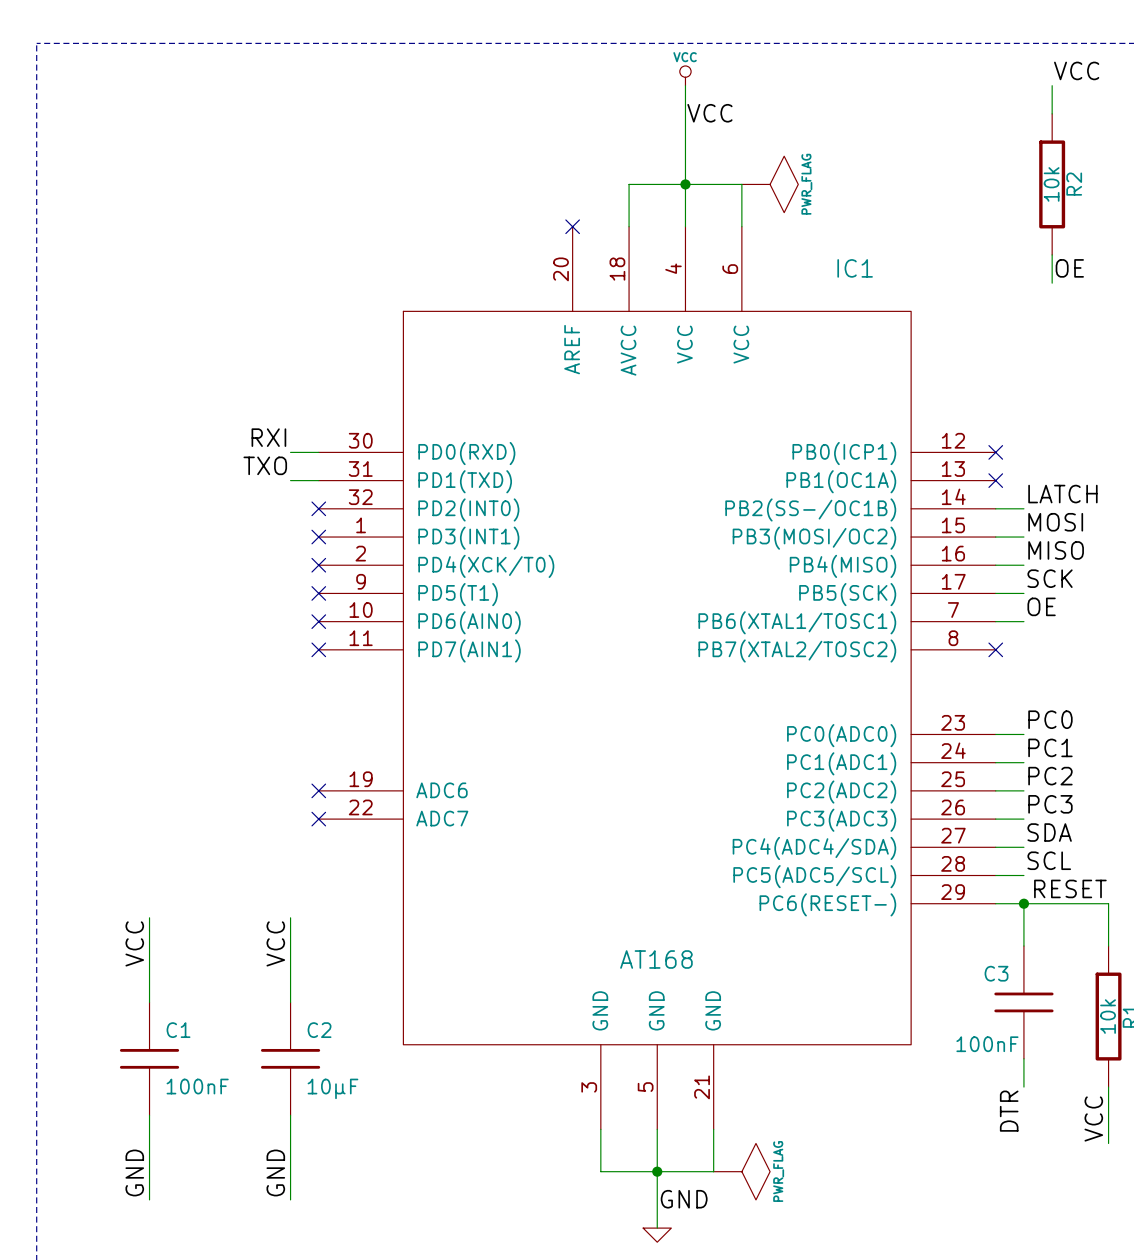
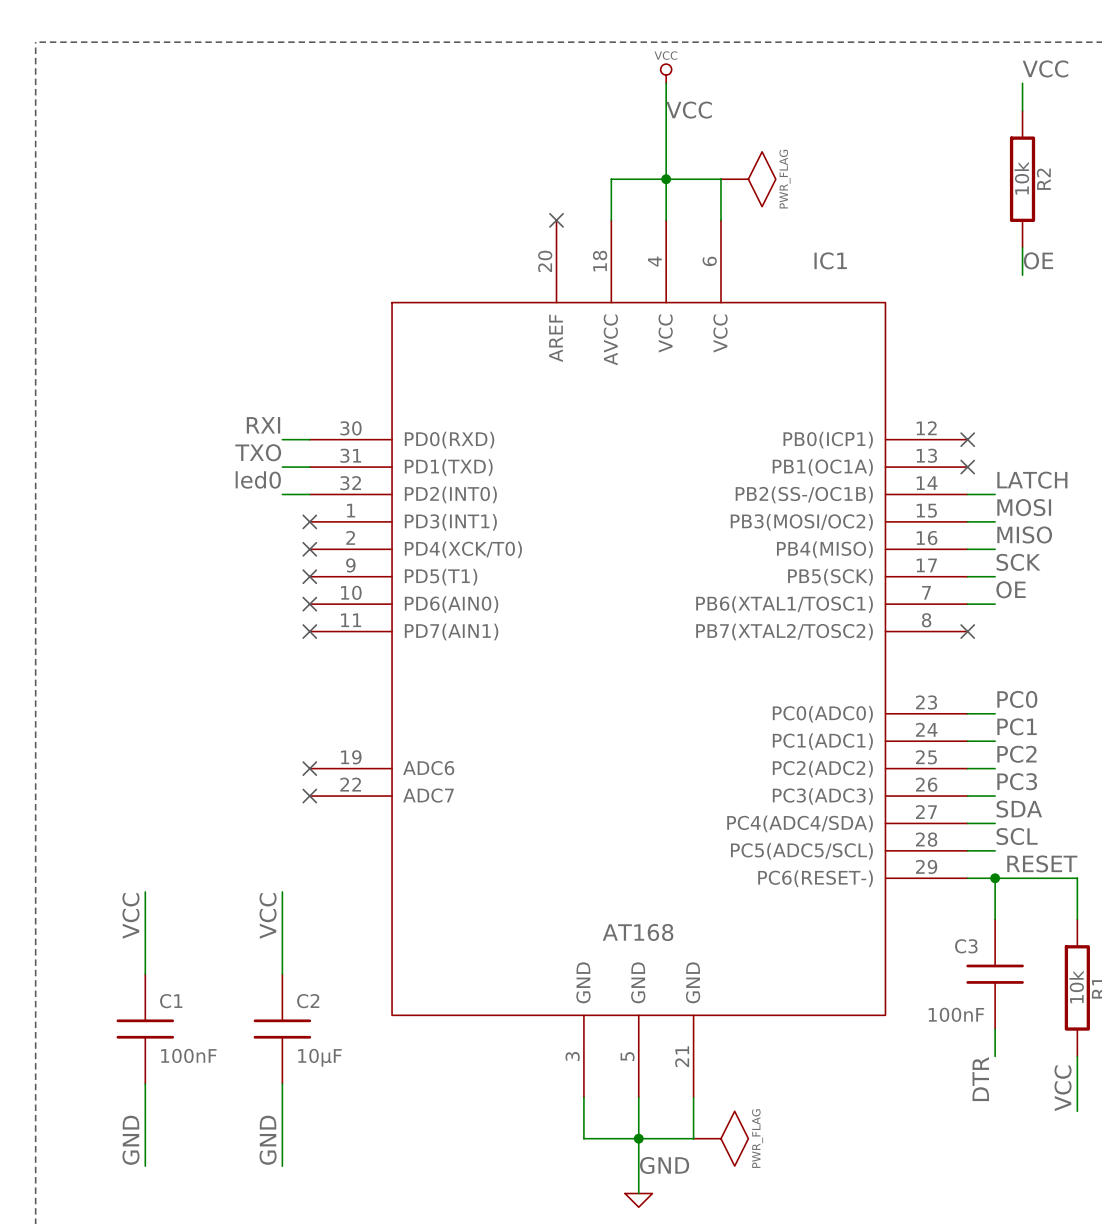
label: none -> led0 (258, 479)
wire: none -> (282, 494) (309, 494)
no-connect mark: (318, 508) -> none

